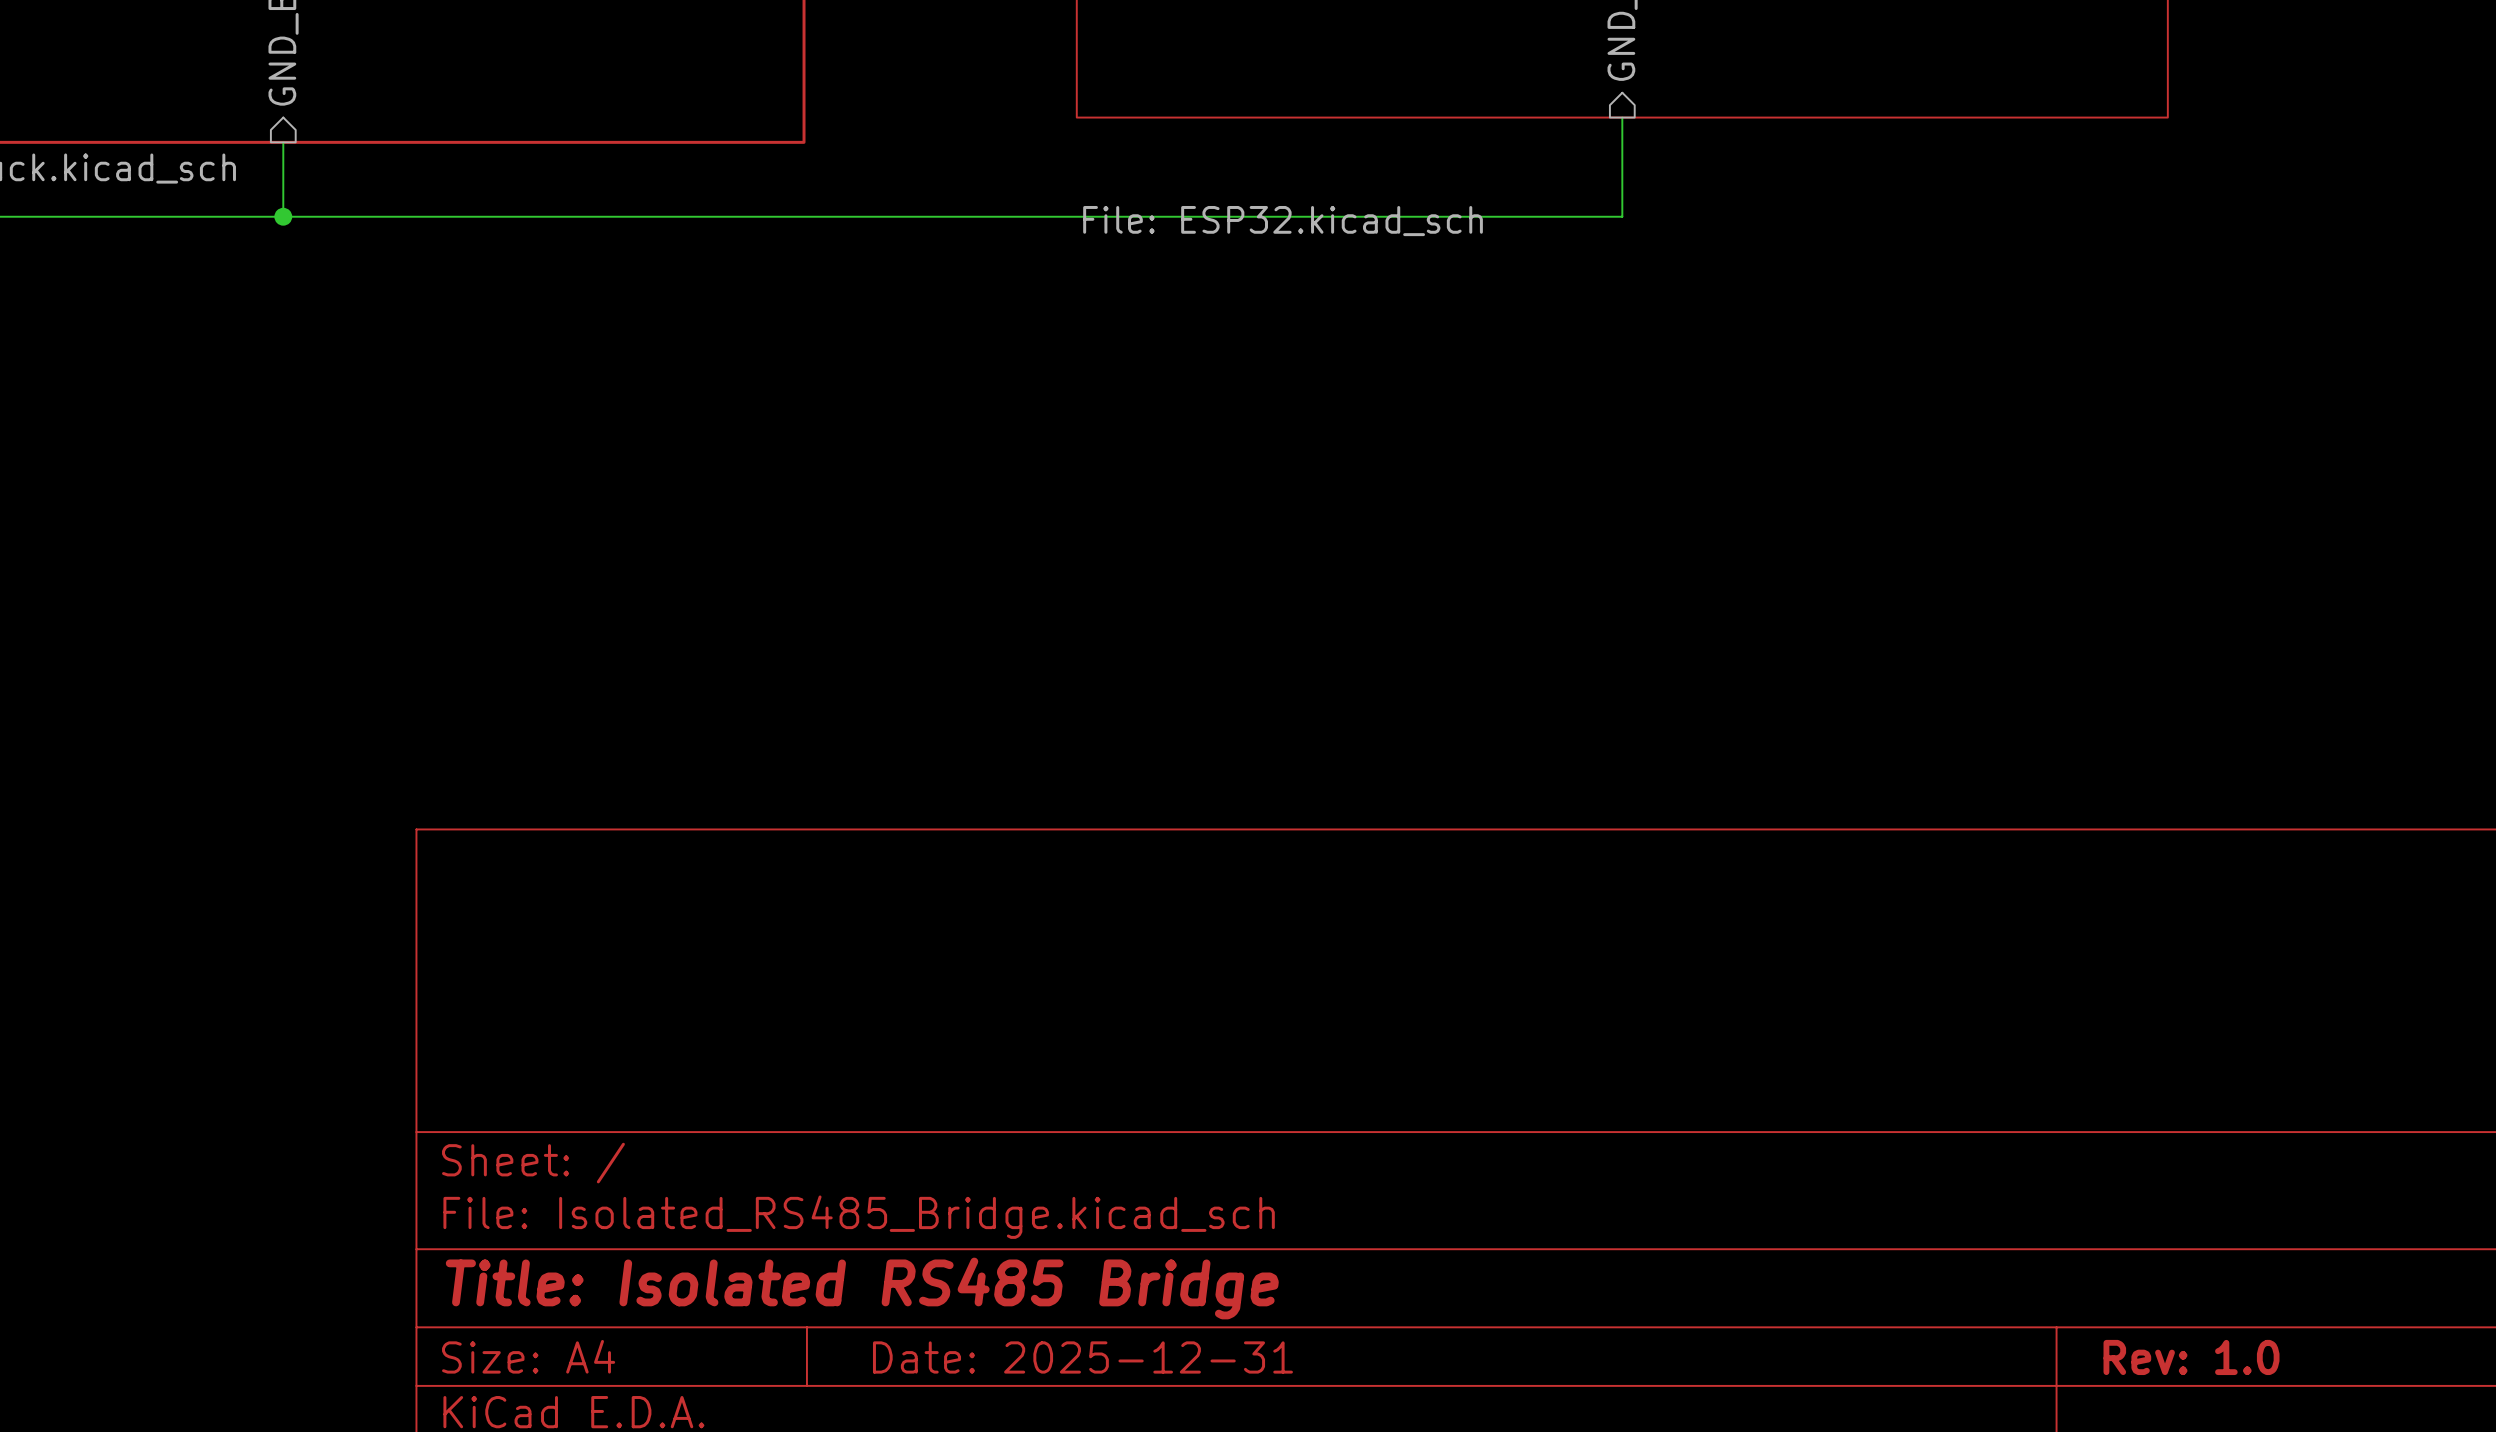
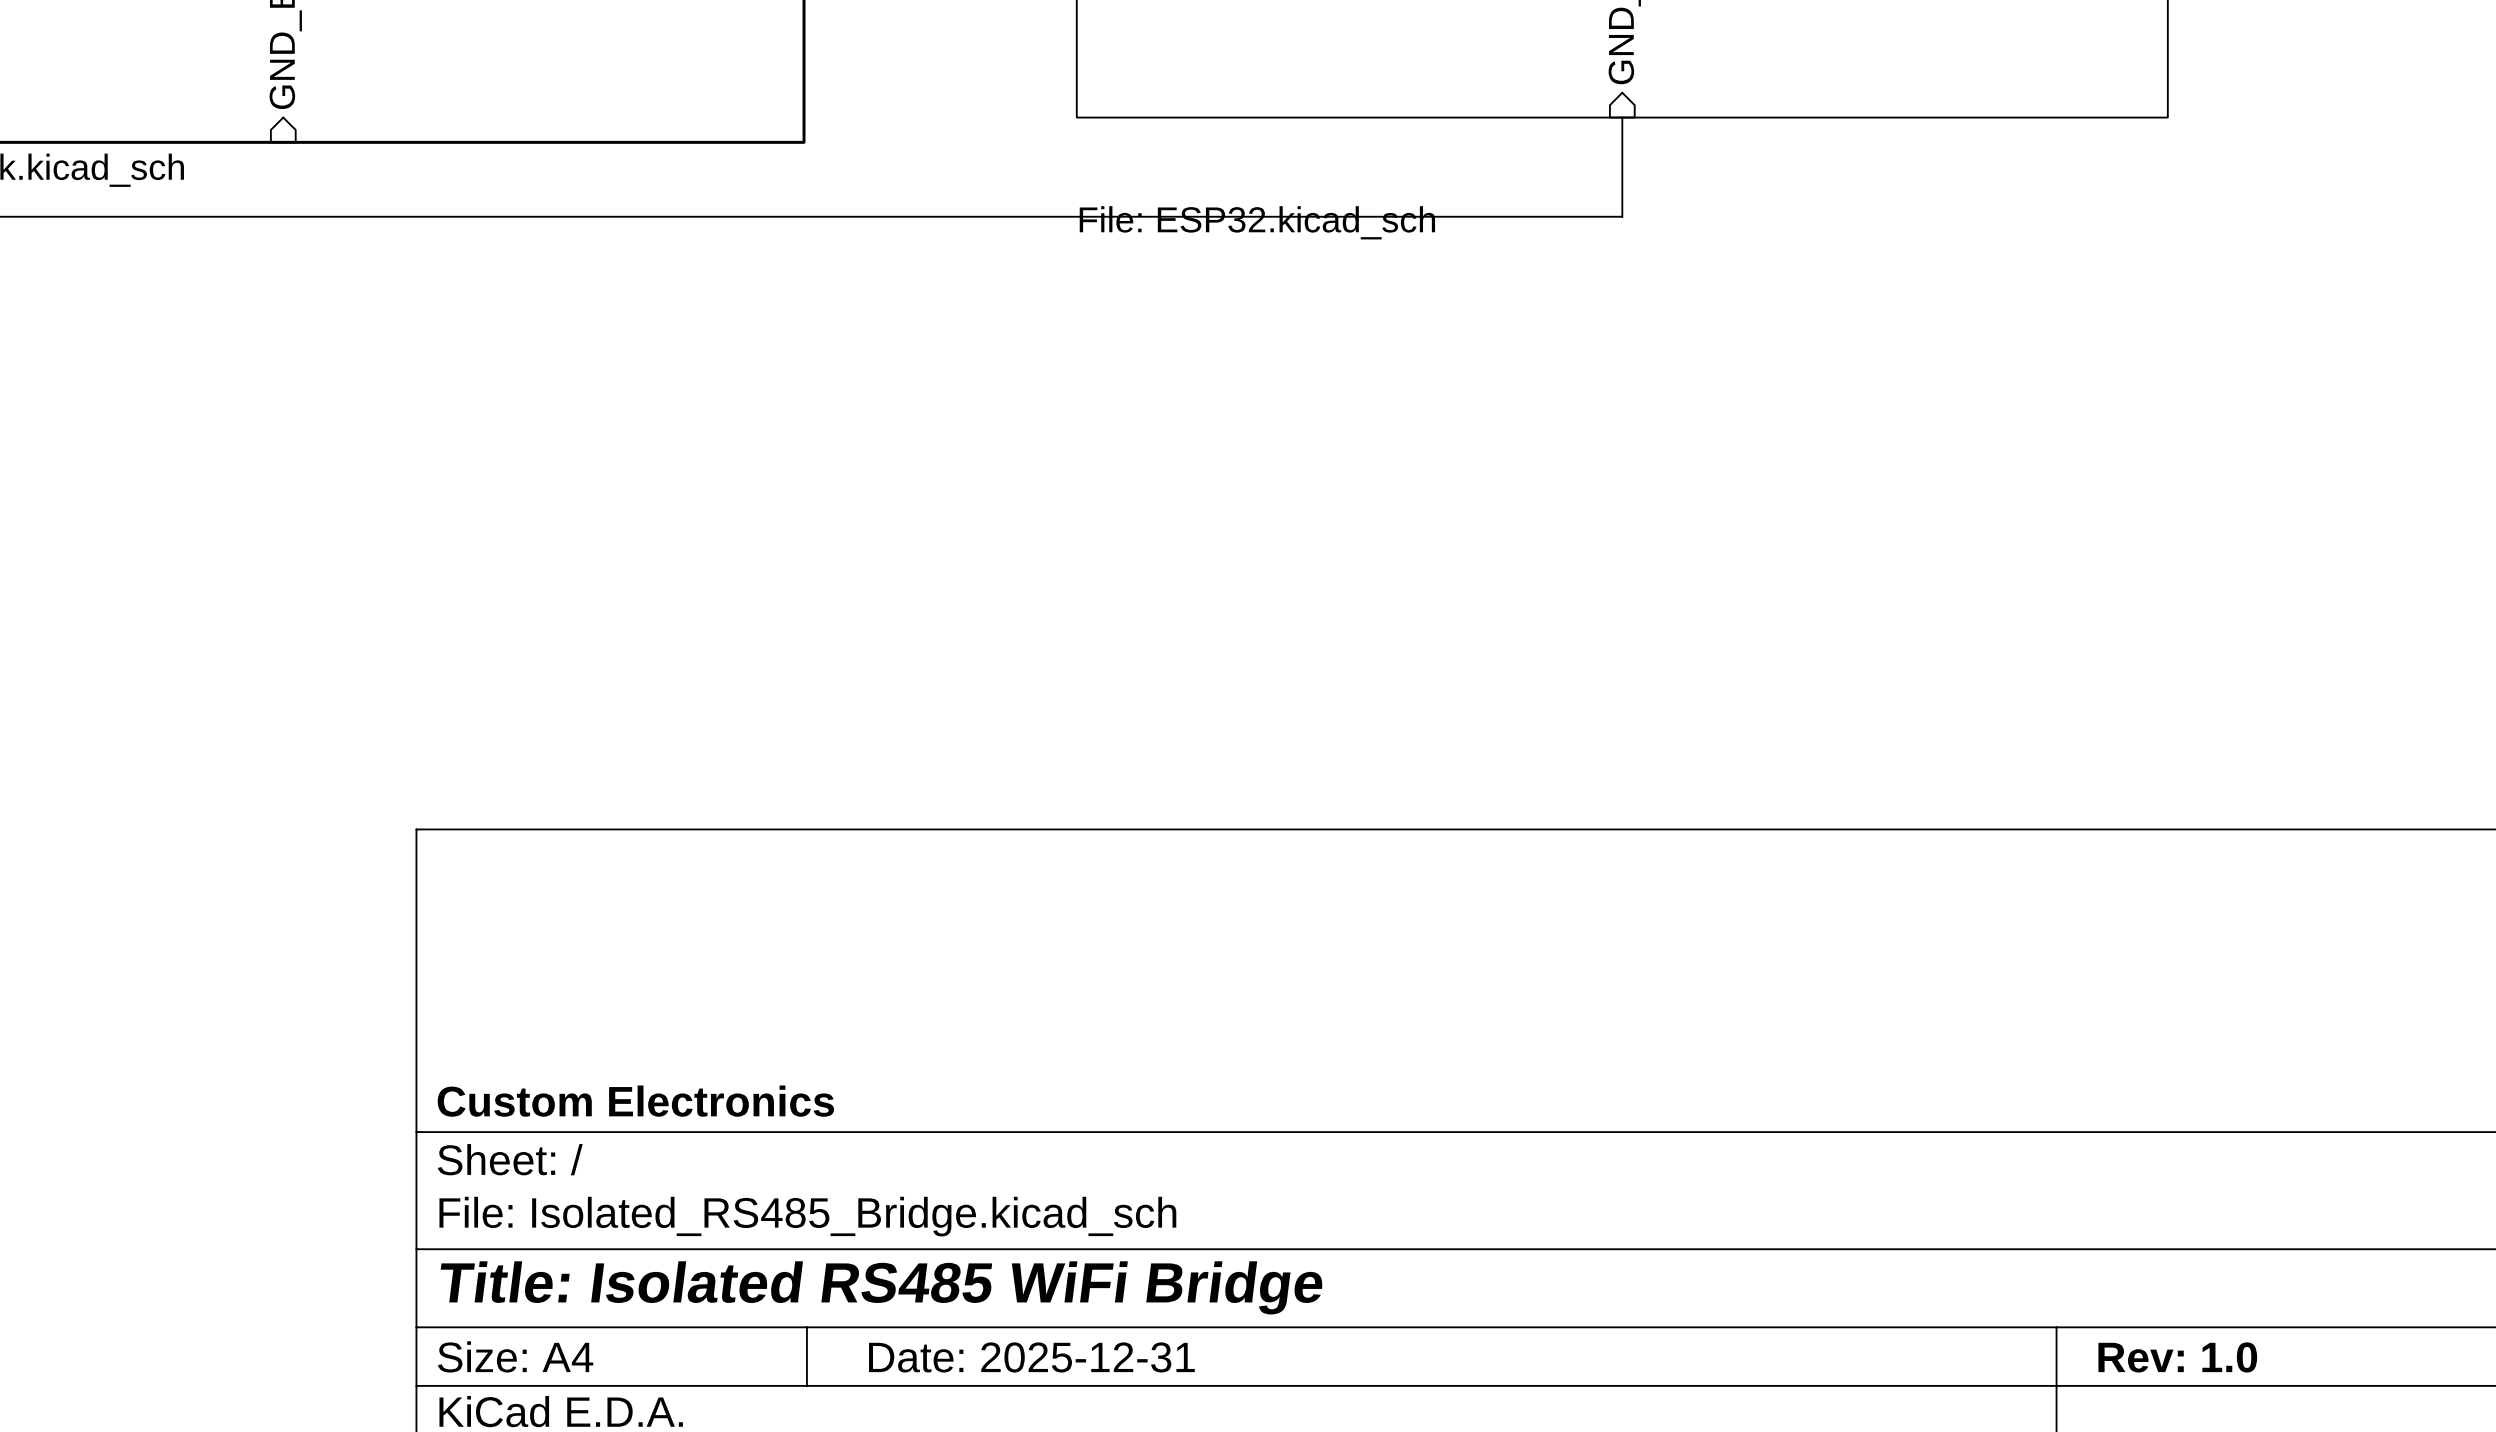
wire: (283, 142) (283, 216) -> none
junction: (283, 216) -> none
title block: none -> Custom Electronics (635, 1101)
title block: Title: Isolated RS485 Bridge (862, 1288) -> Title: Isolated RS485 WiFi Bridge (881, 1287)

